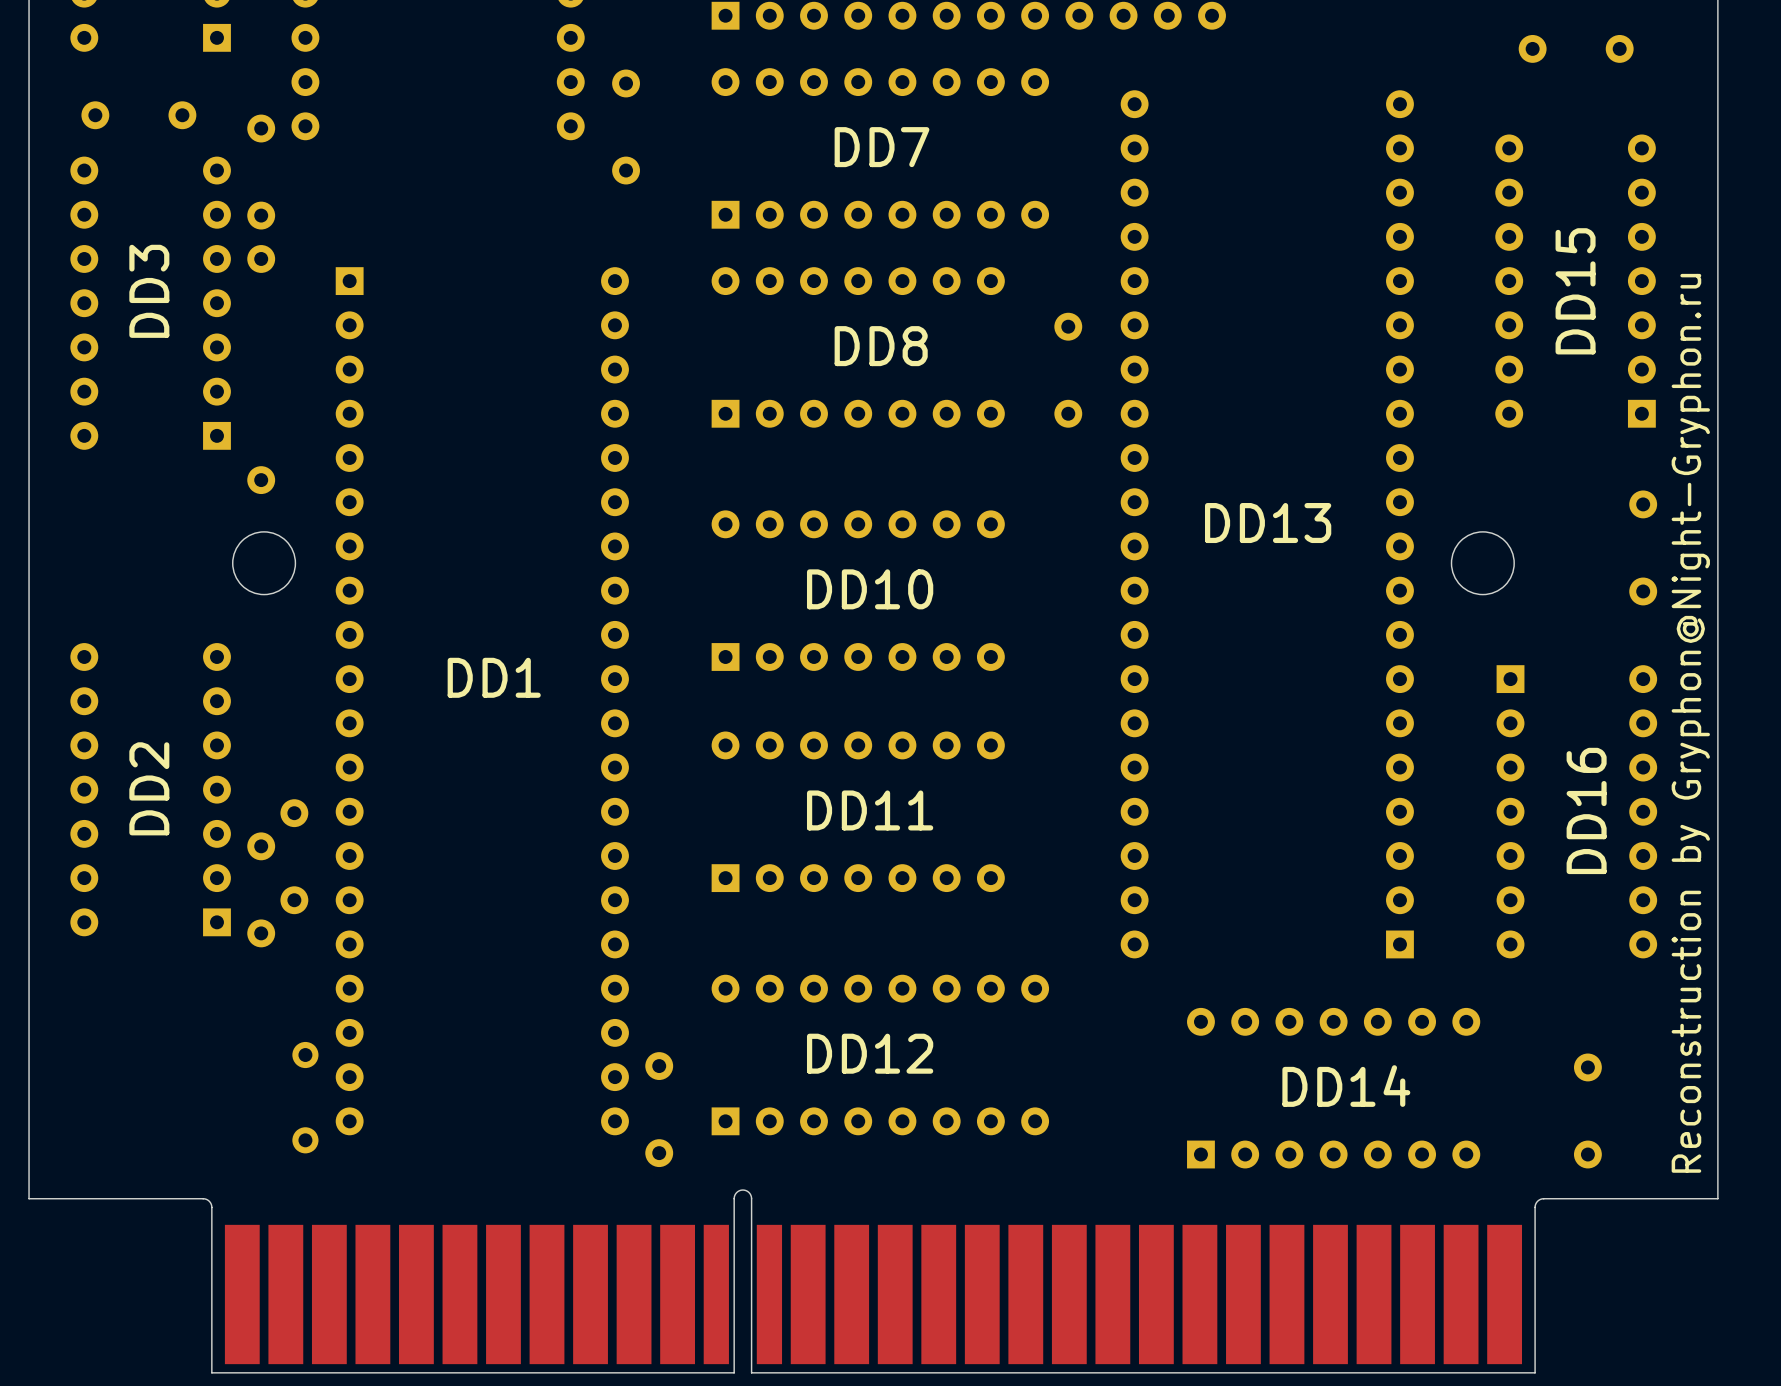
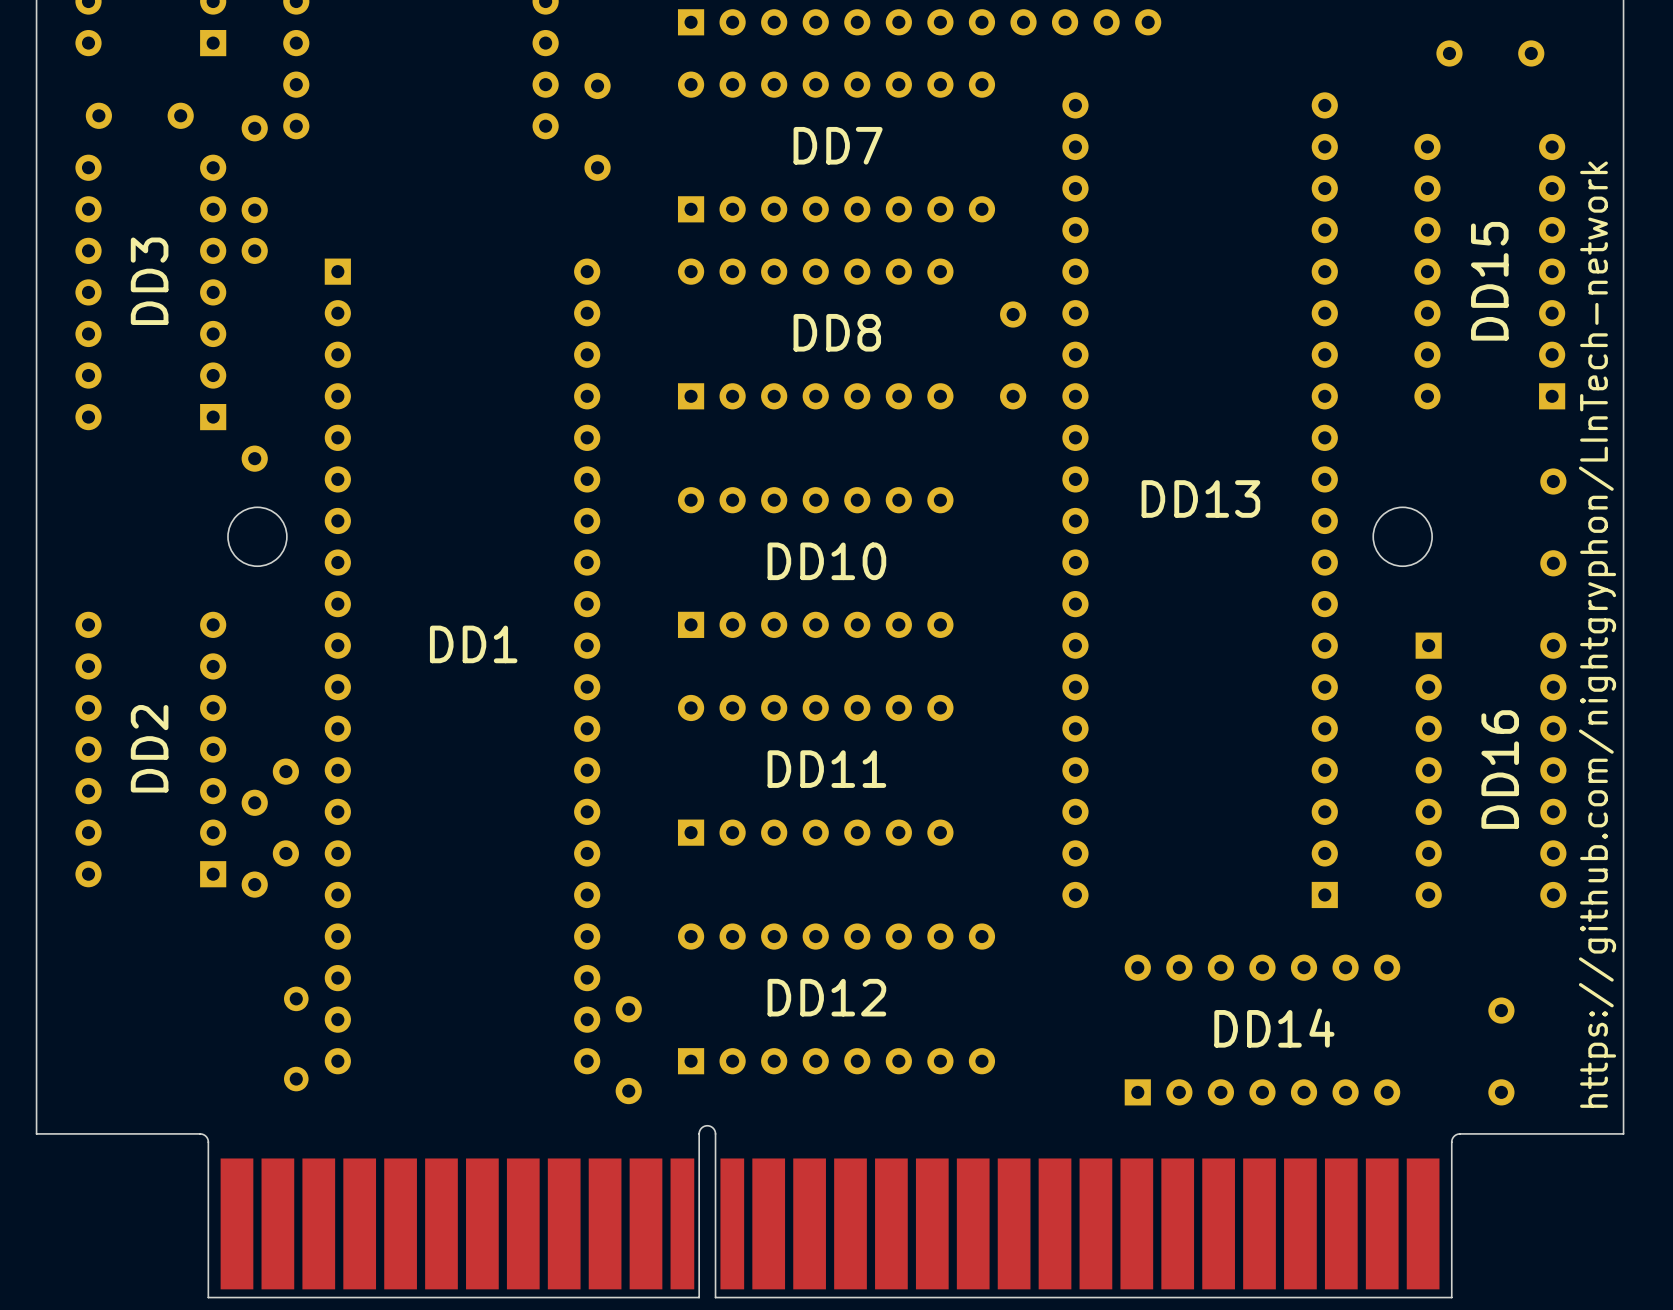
text: none -> https://github.com/nightgryphon/LInTech-network (1597, 634)
text: Reconstruction by Gryphon@Night-Gryphon.ru (1690, 723) -> none

